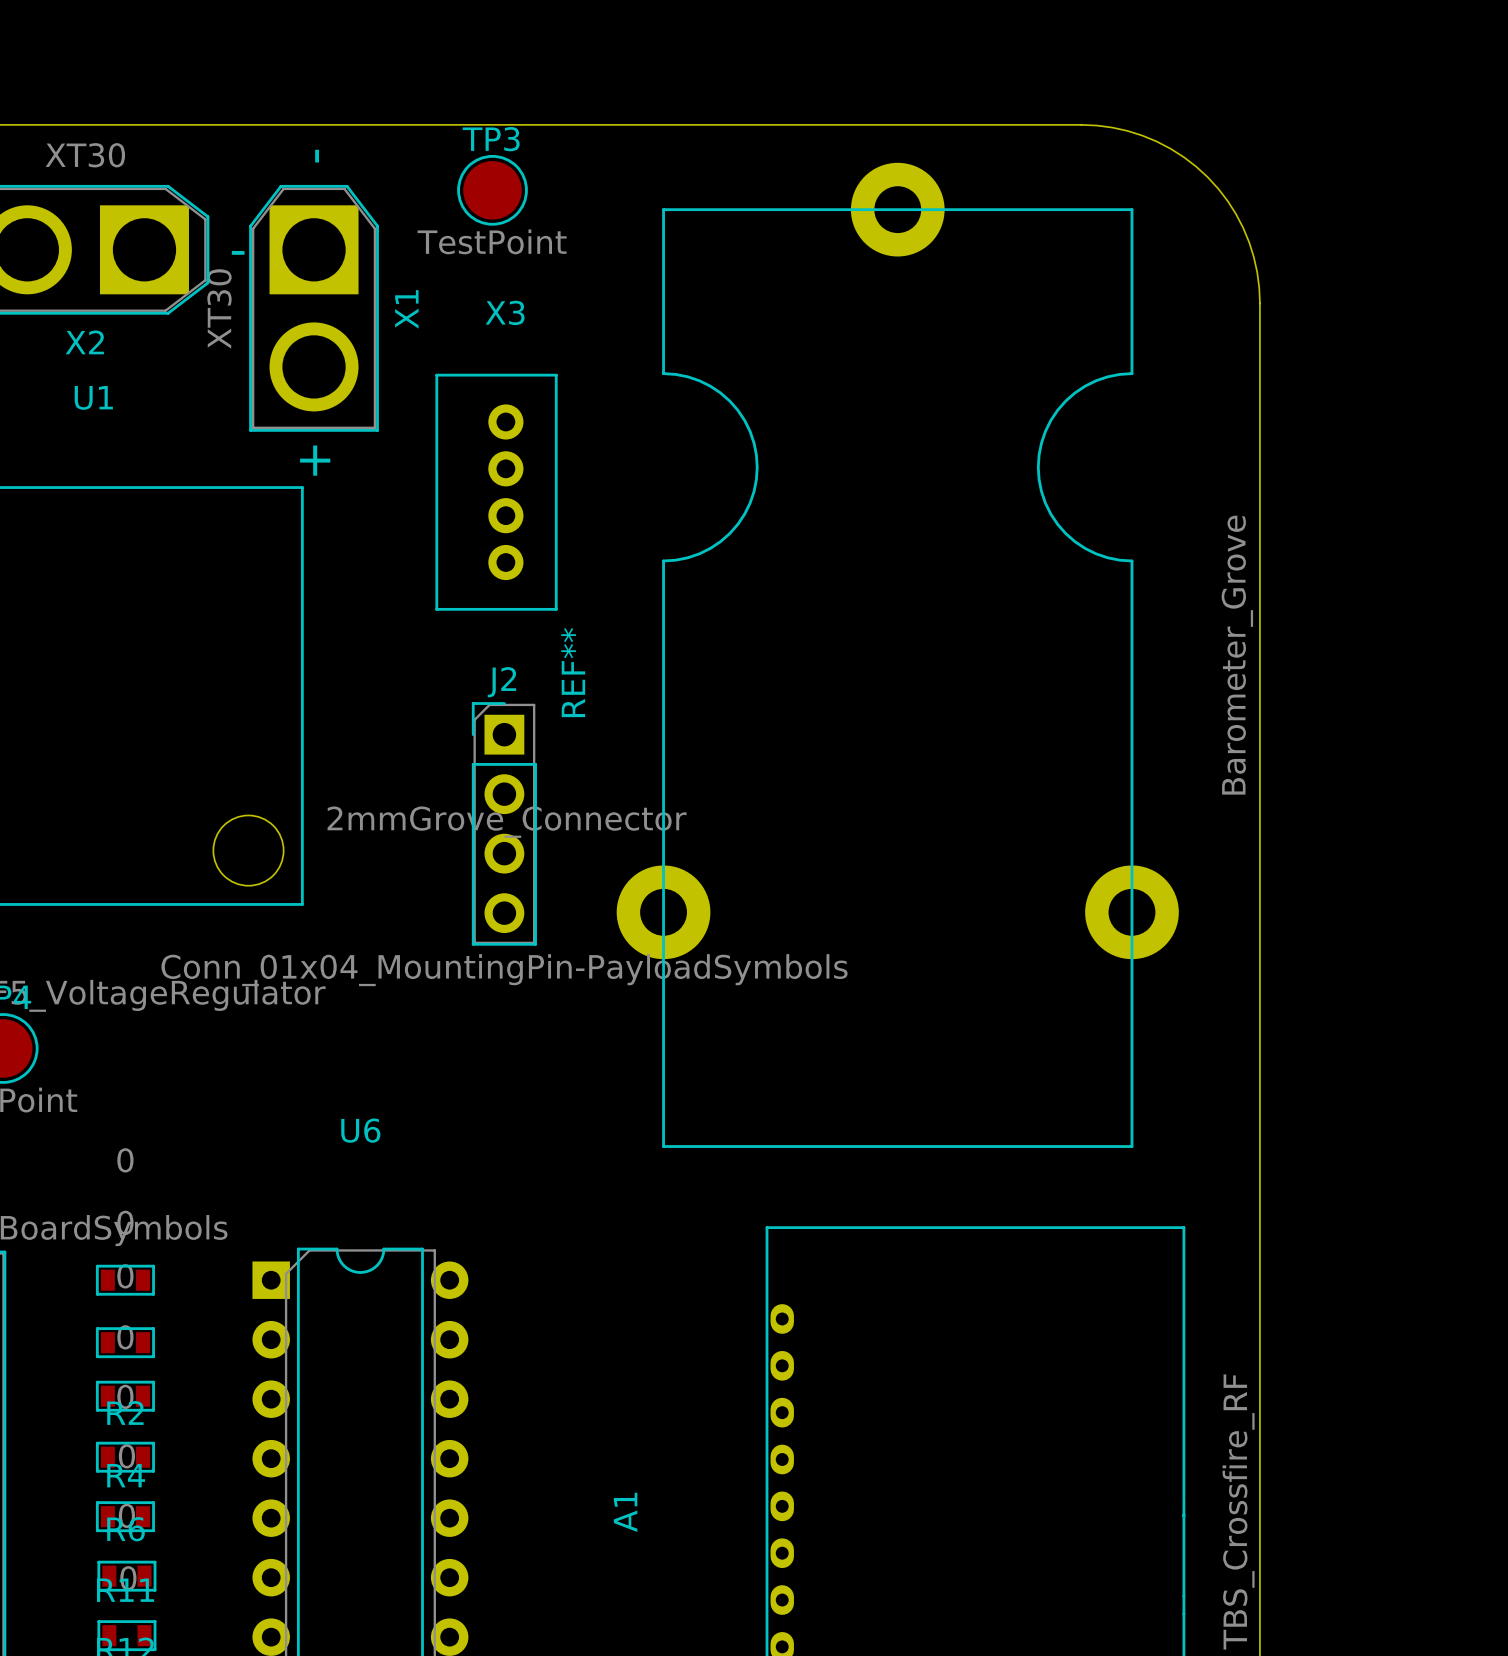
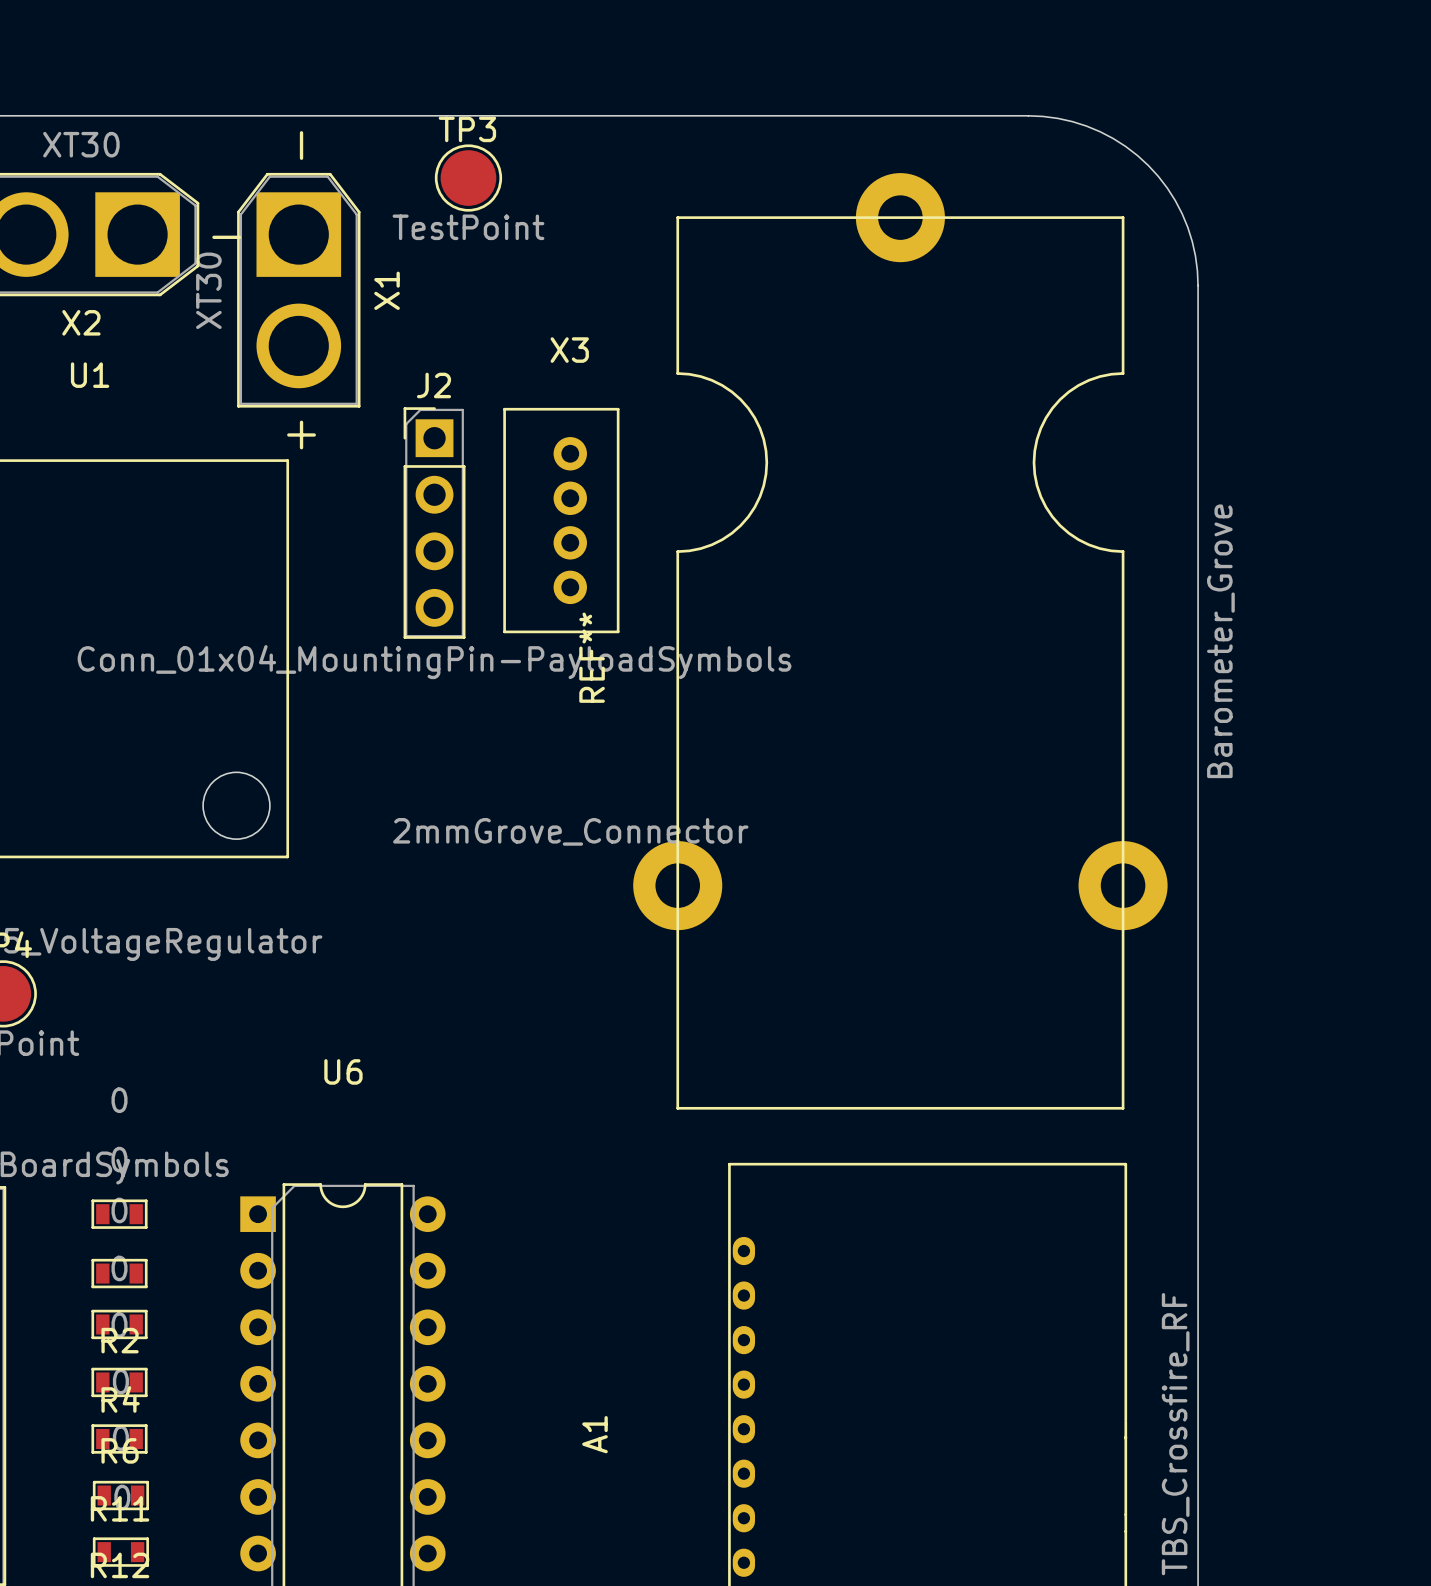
X3 position: (496, 492) -> (561, 520)
REF** position: (897, 655) -> (900, 641)
J2 position: (504, 823) -> (434, 523)

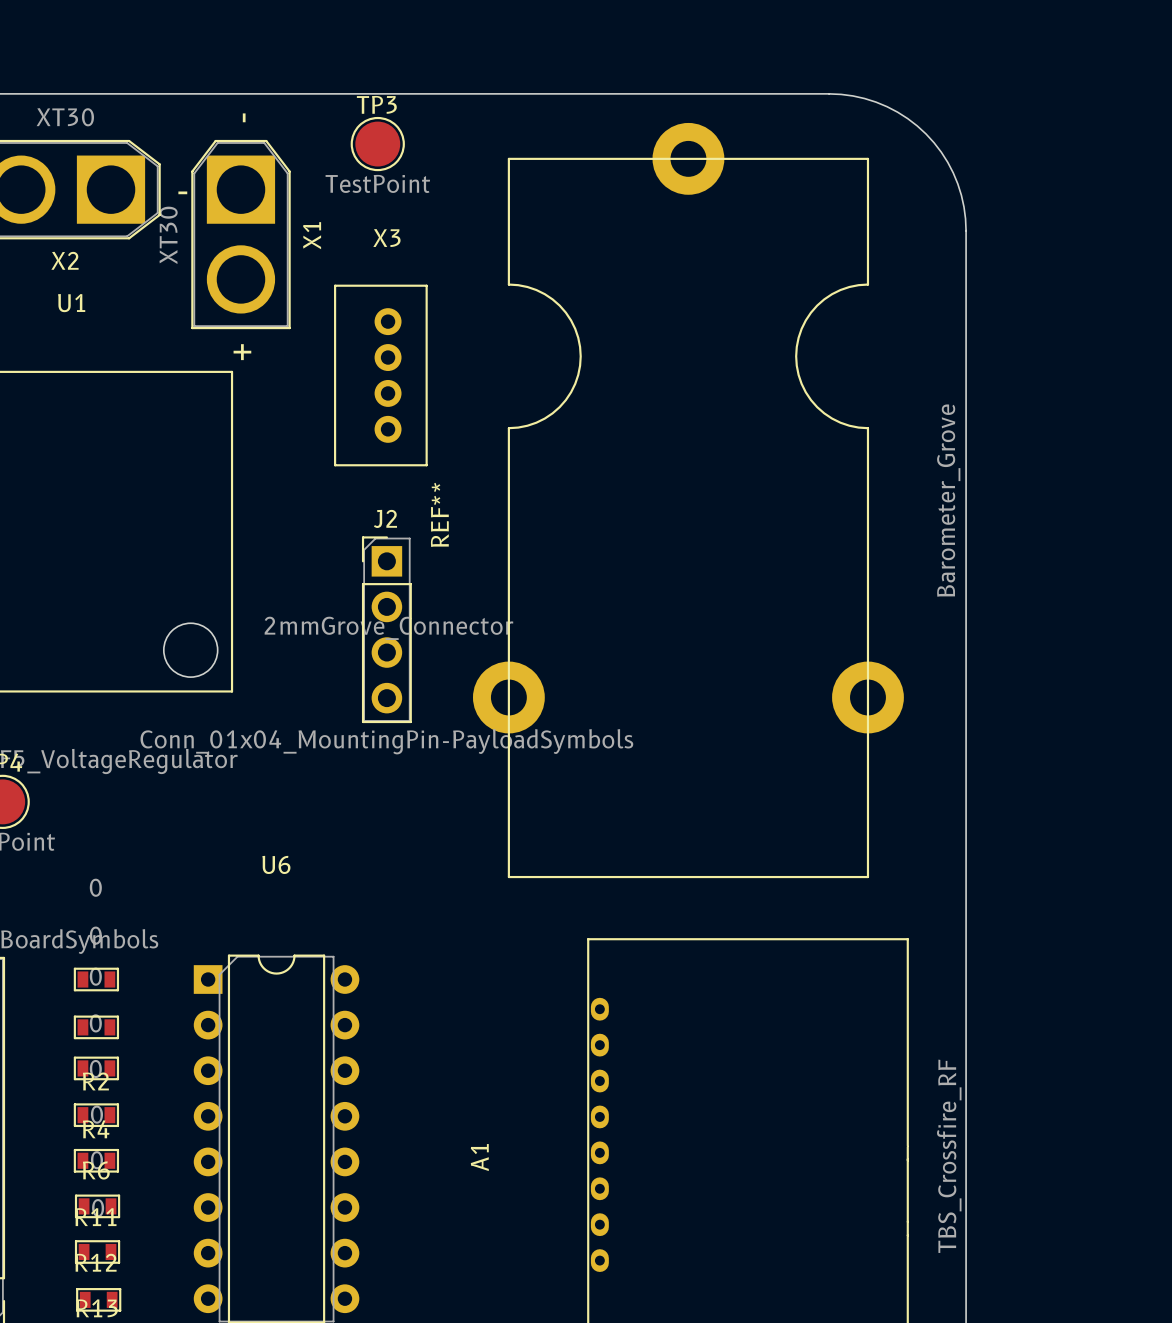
X3 position: (561, 520) -> (380, 375)
J2 position: (434, 523) -> (386, 629)
REF** position: (900, 641) -> (688, 500)

